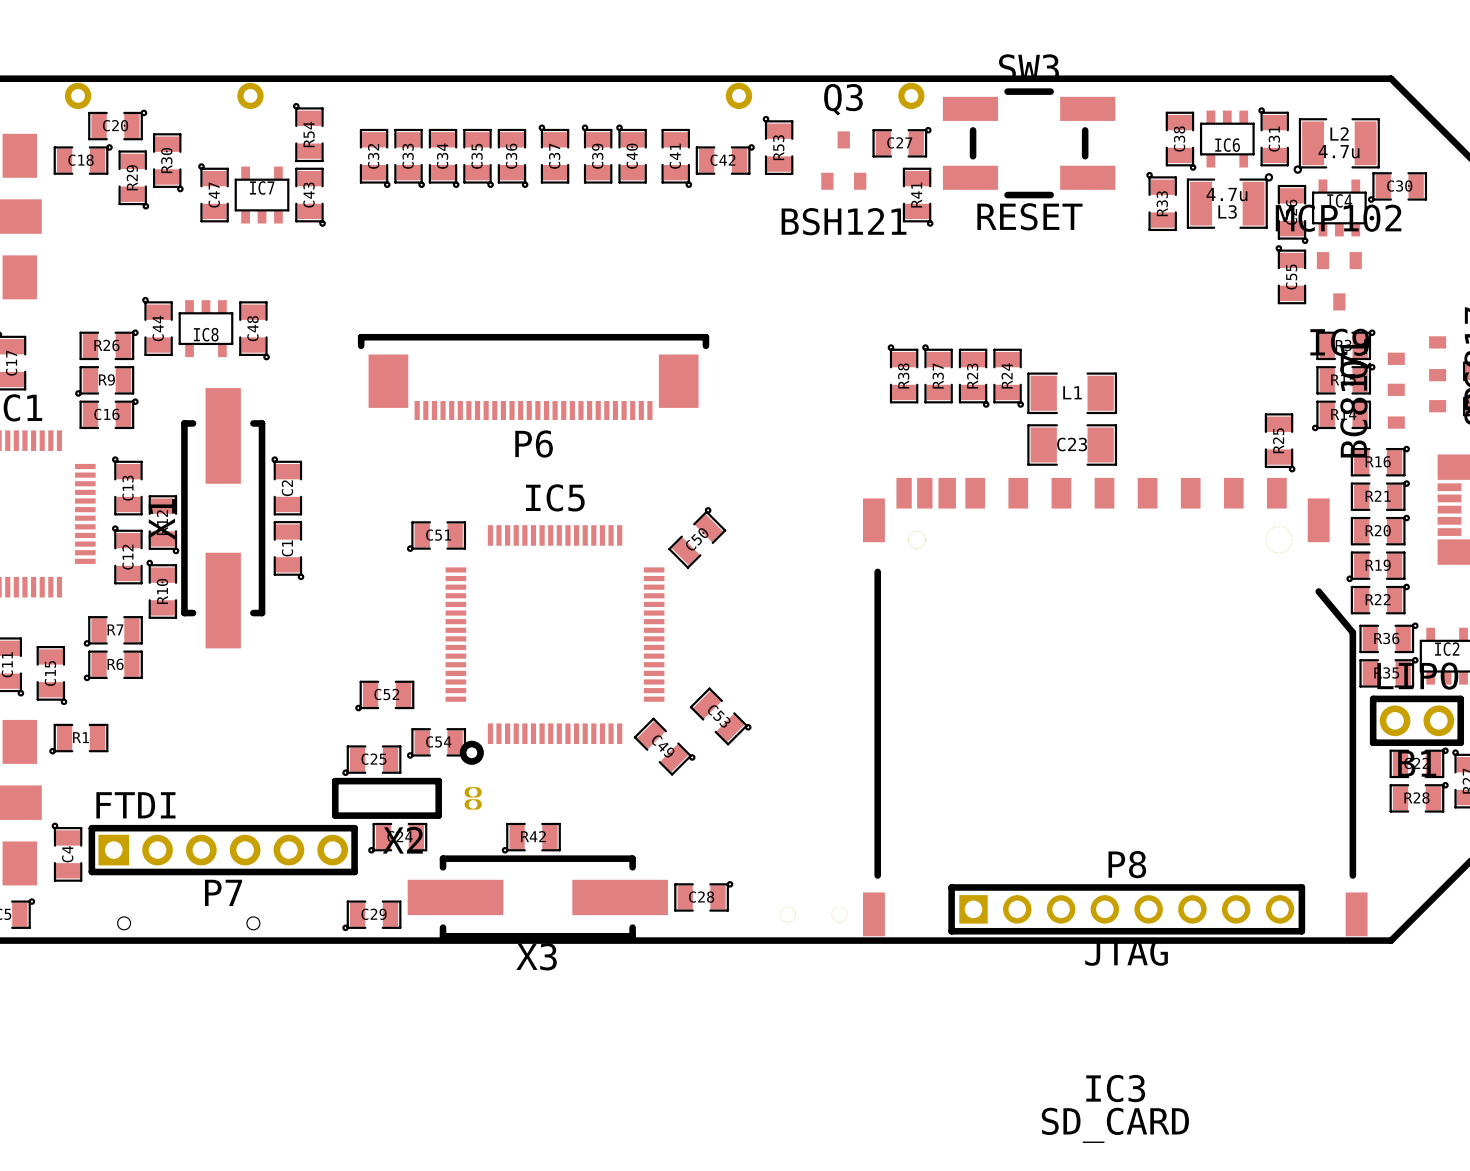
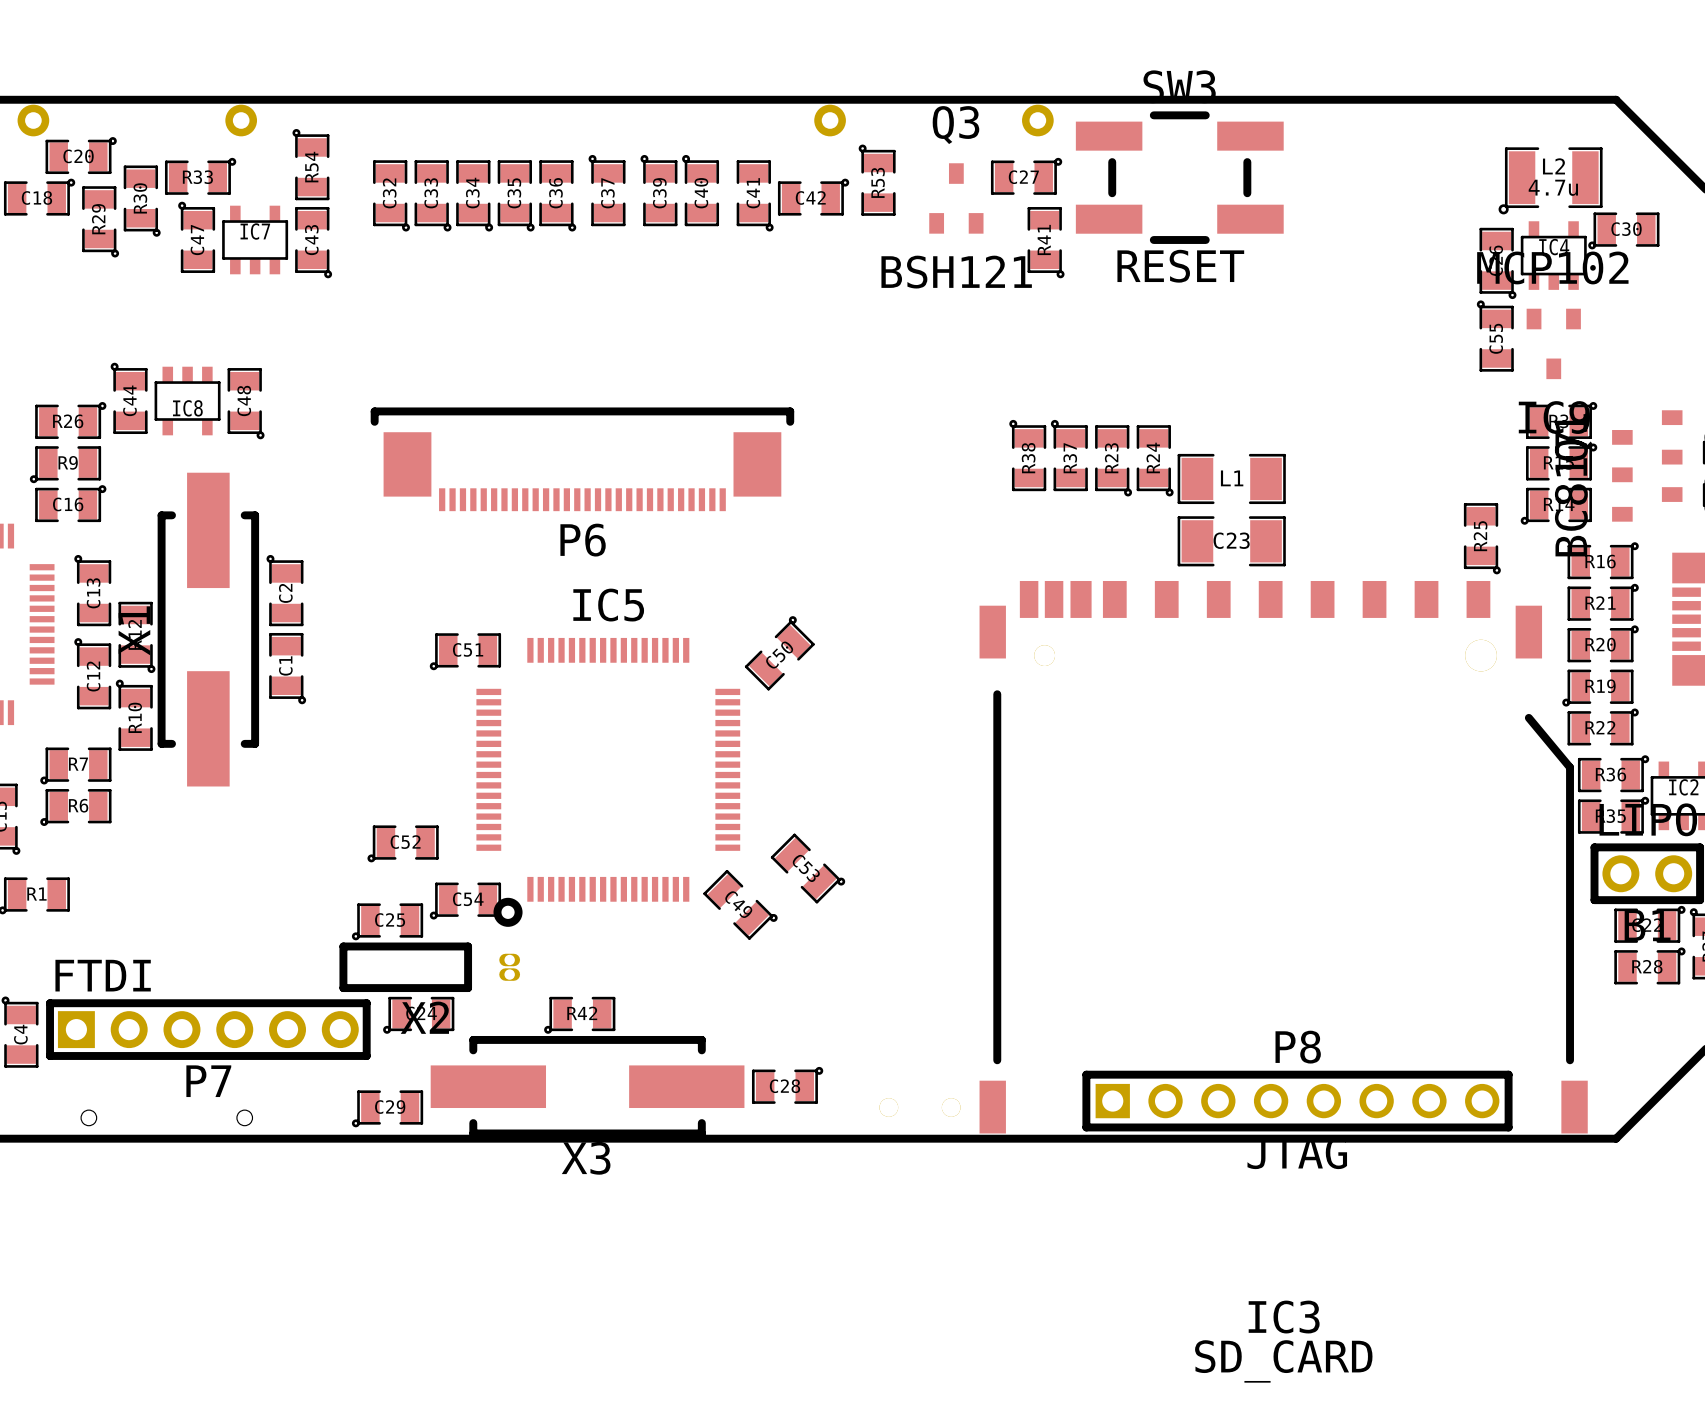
C31: (1273, 136) -> none
IC6: (1227, 139) -> none
C38: (1181, 141) -> none
R33 rotation: 0° (1161, 201) -> 90° clockwise (200, 176)
R33 position: (1161, 201) -> (200, 176)
L3: 4.7u (1229, 201) -> none

